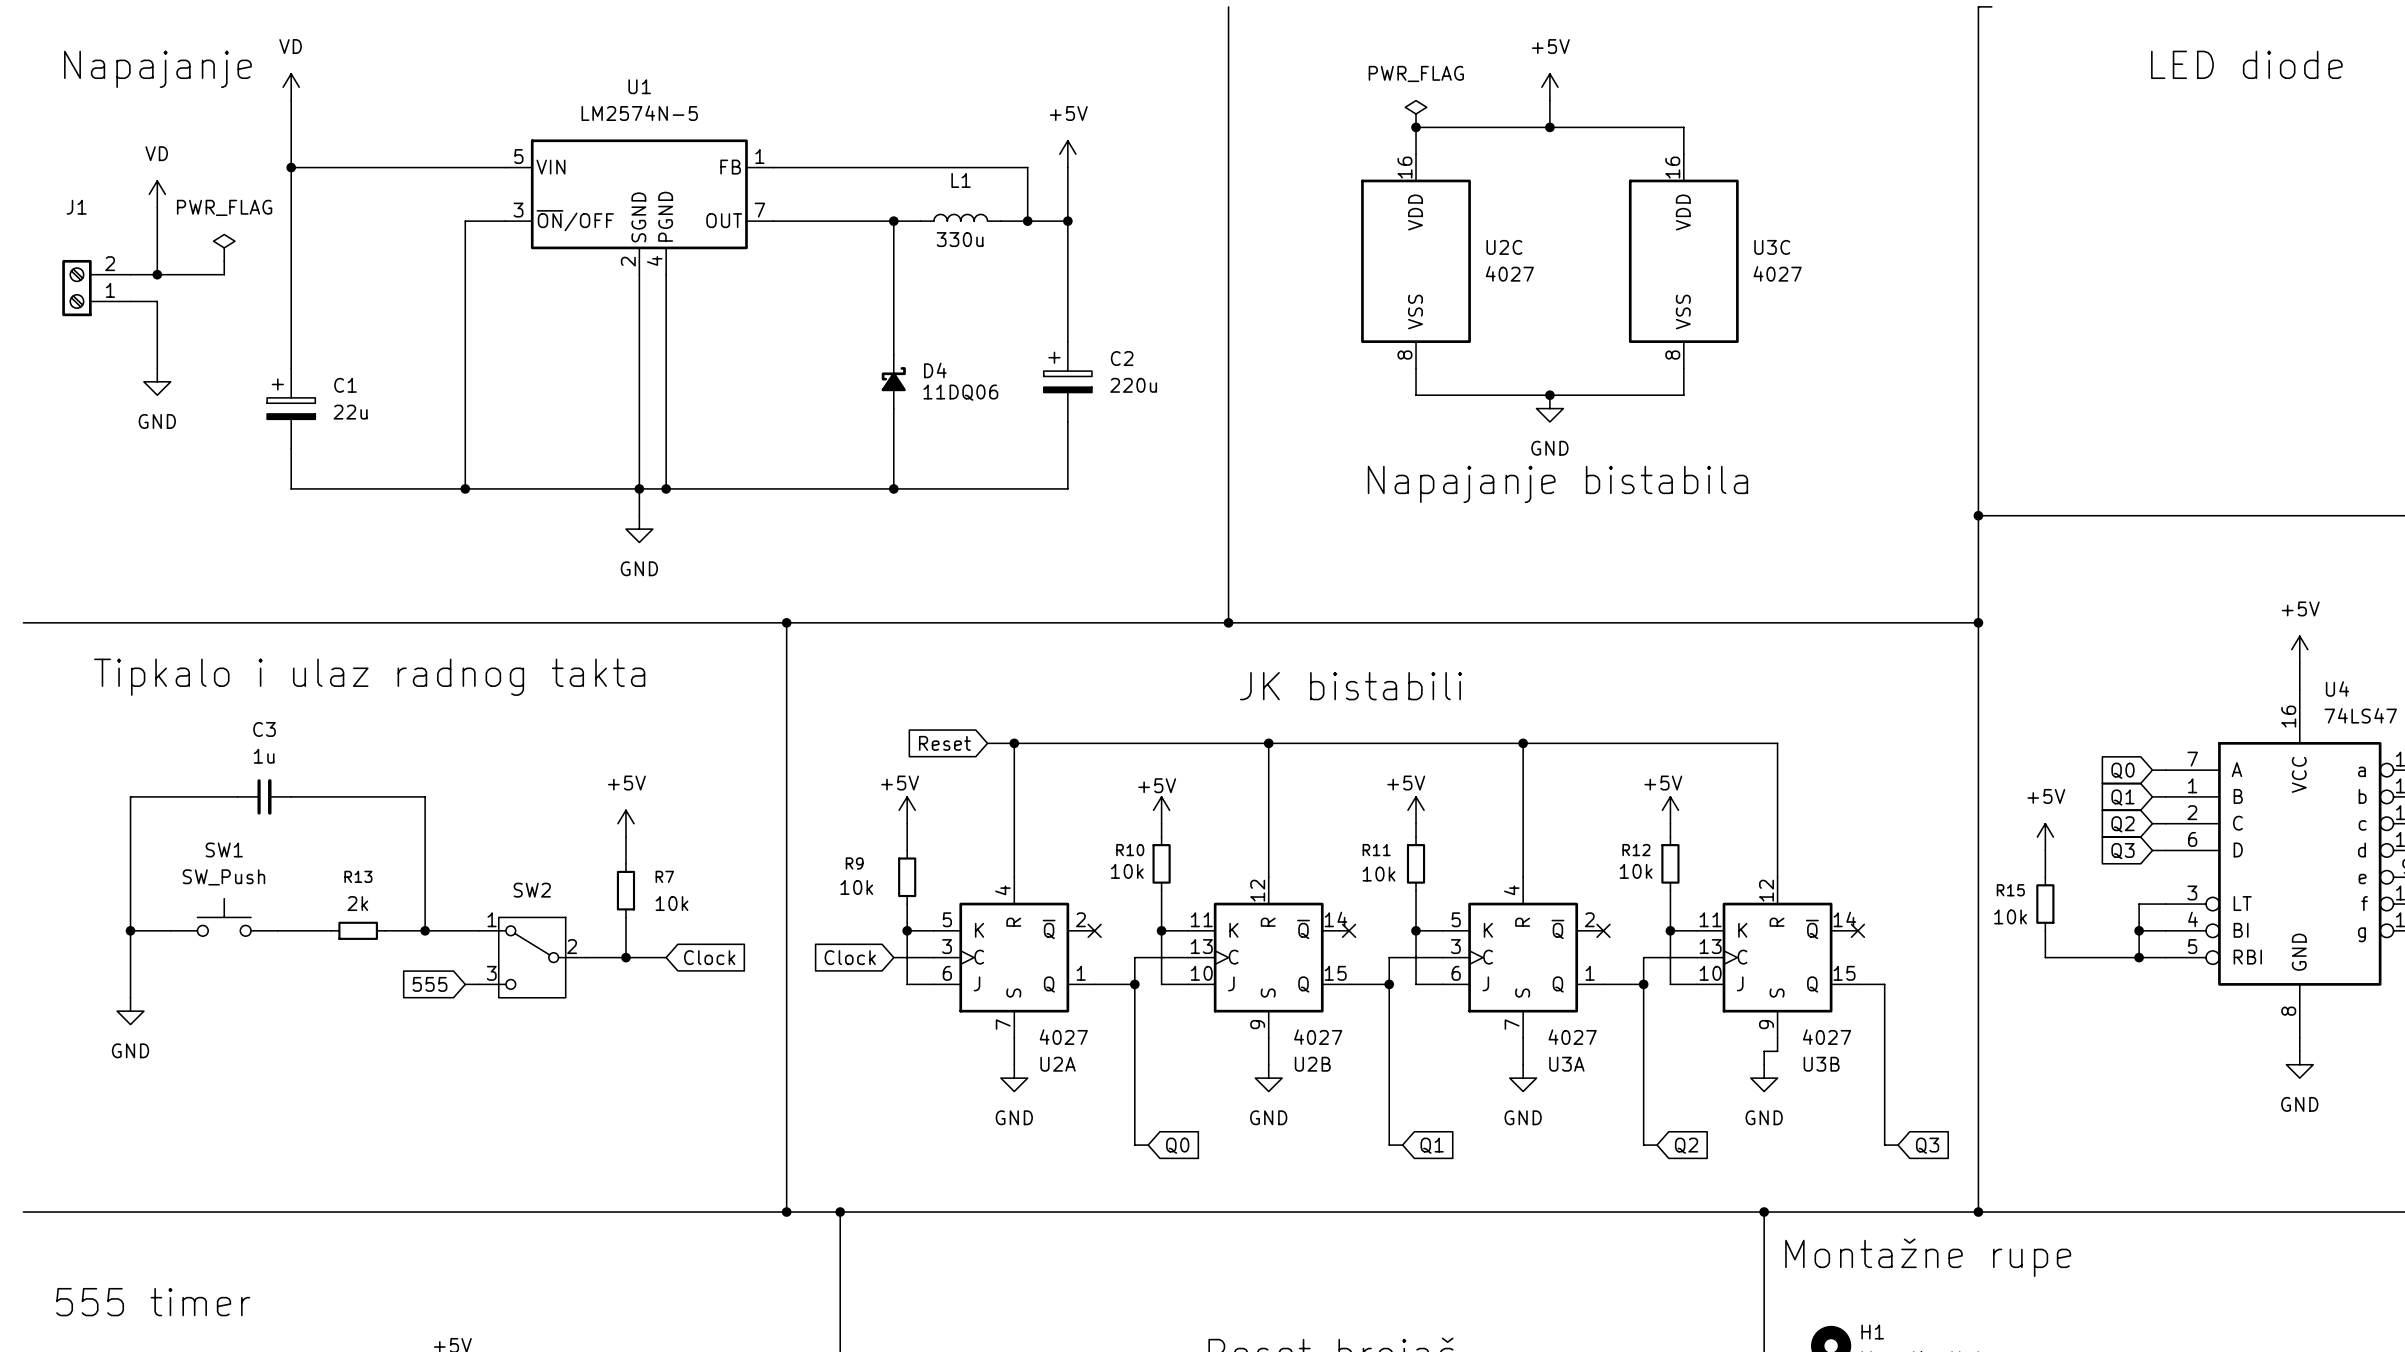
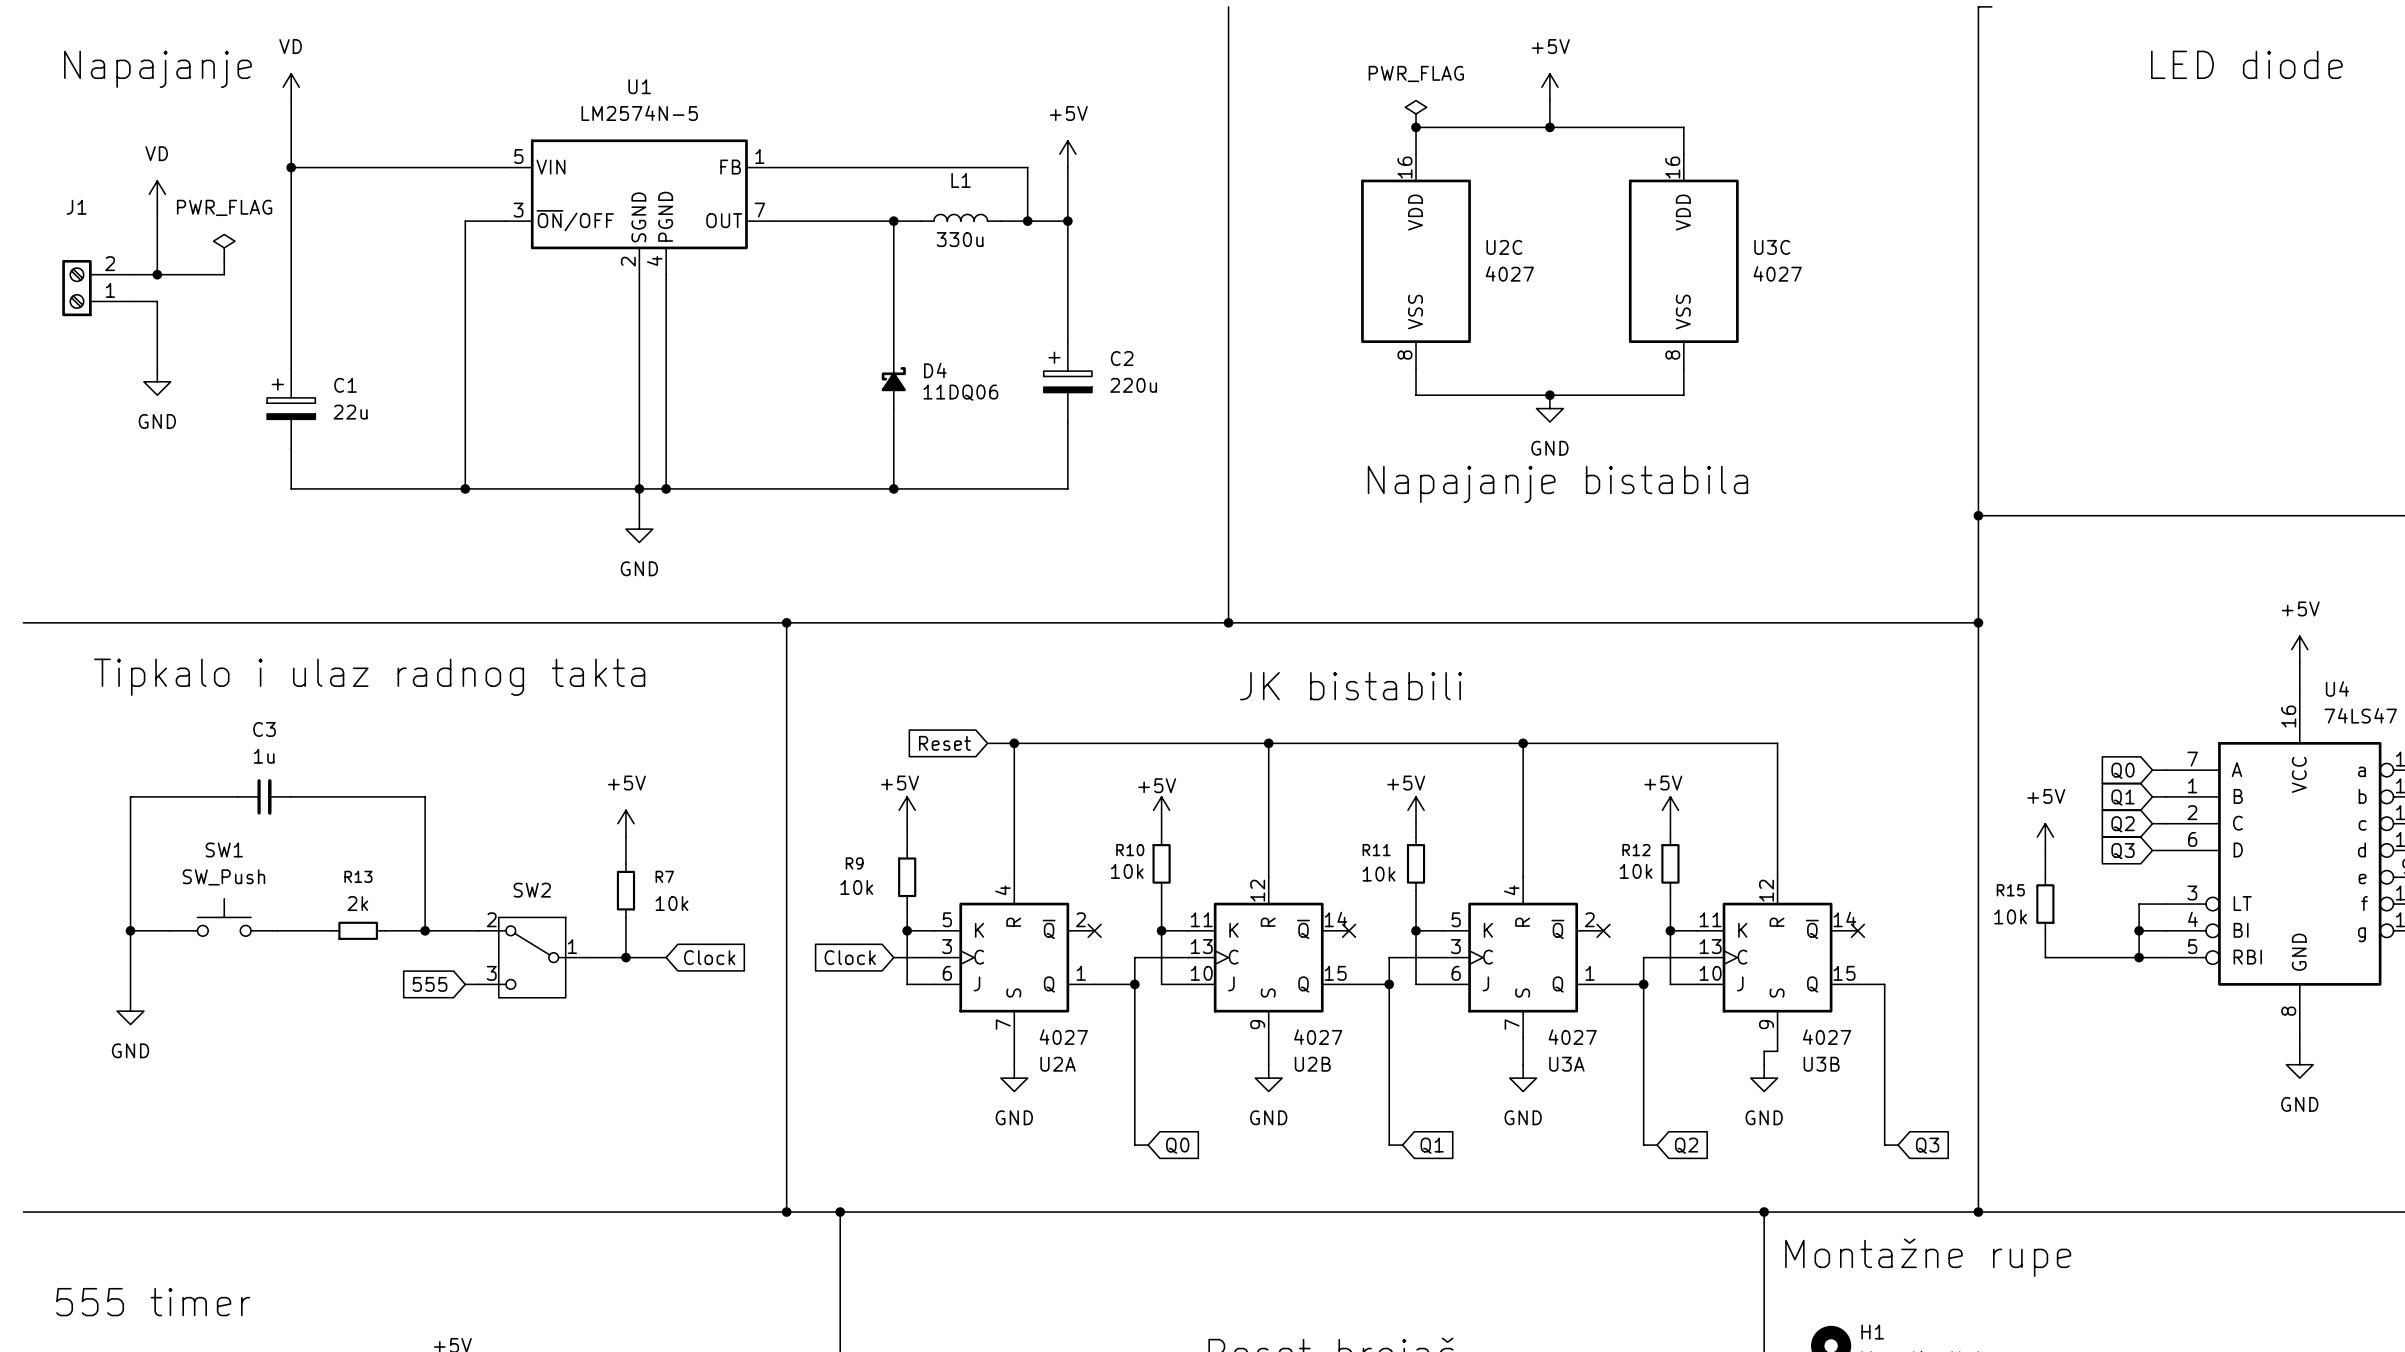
SW2 pin number: 1 (492, 919) -> 2 (491, 919)
SW2 pin number: 2 (572, 946) -> 1 (572, 946)

